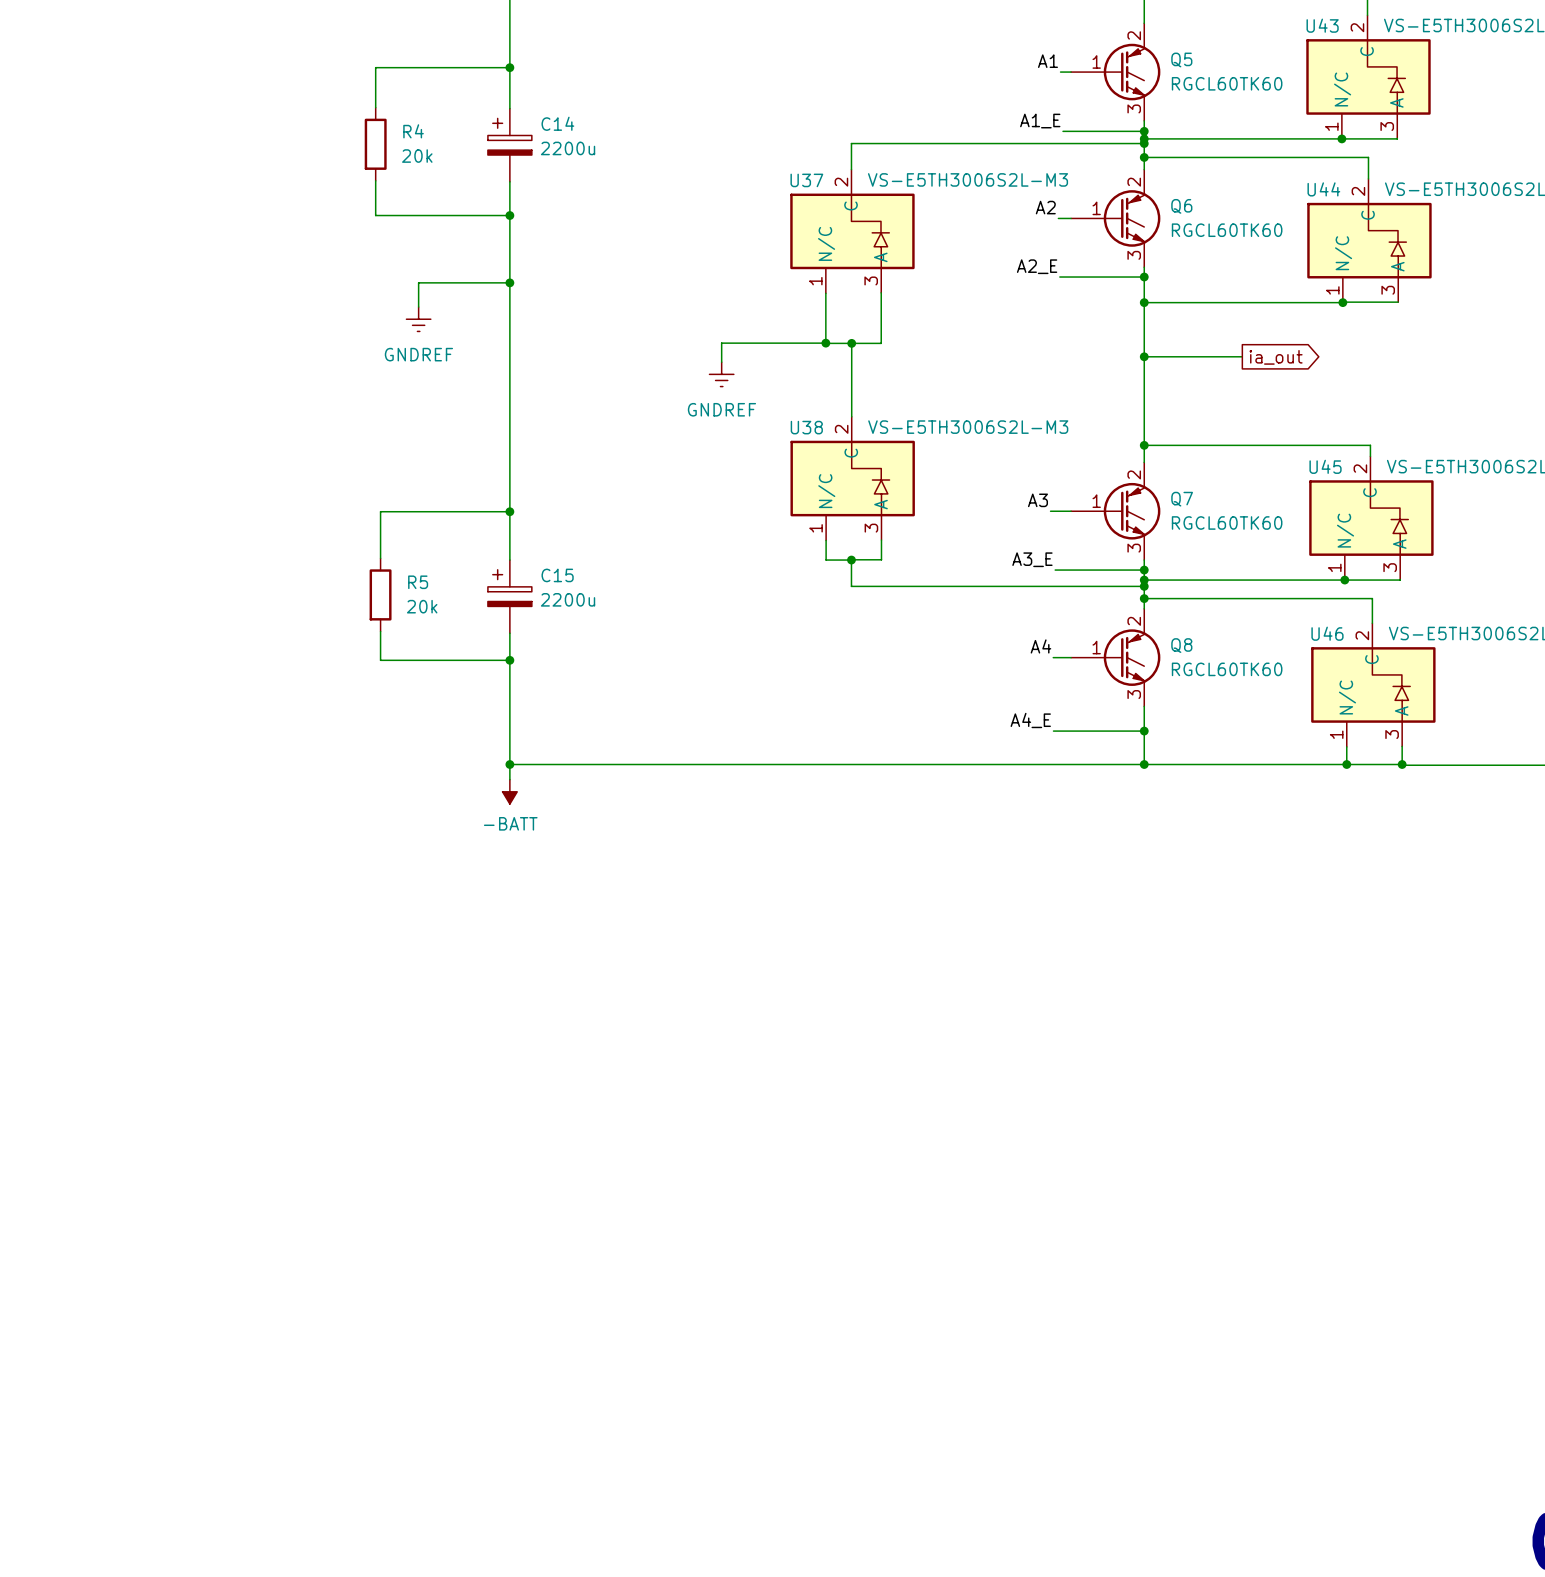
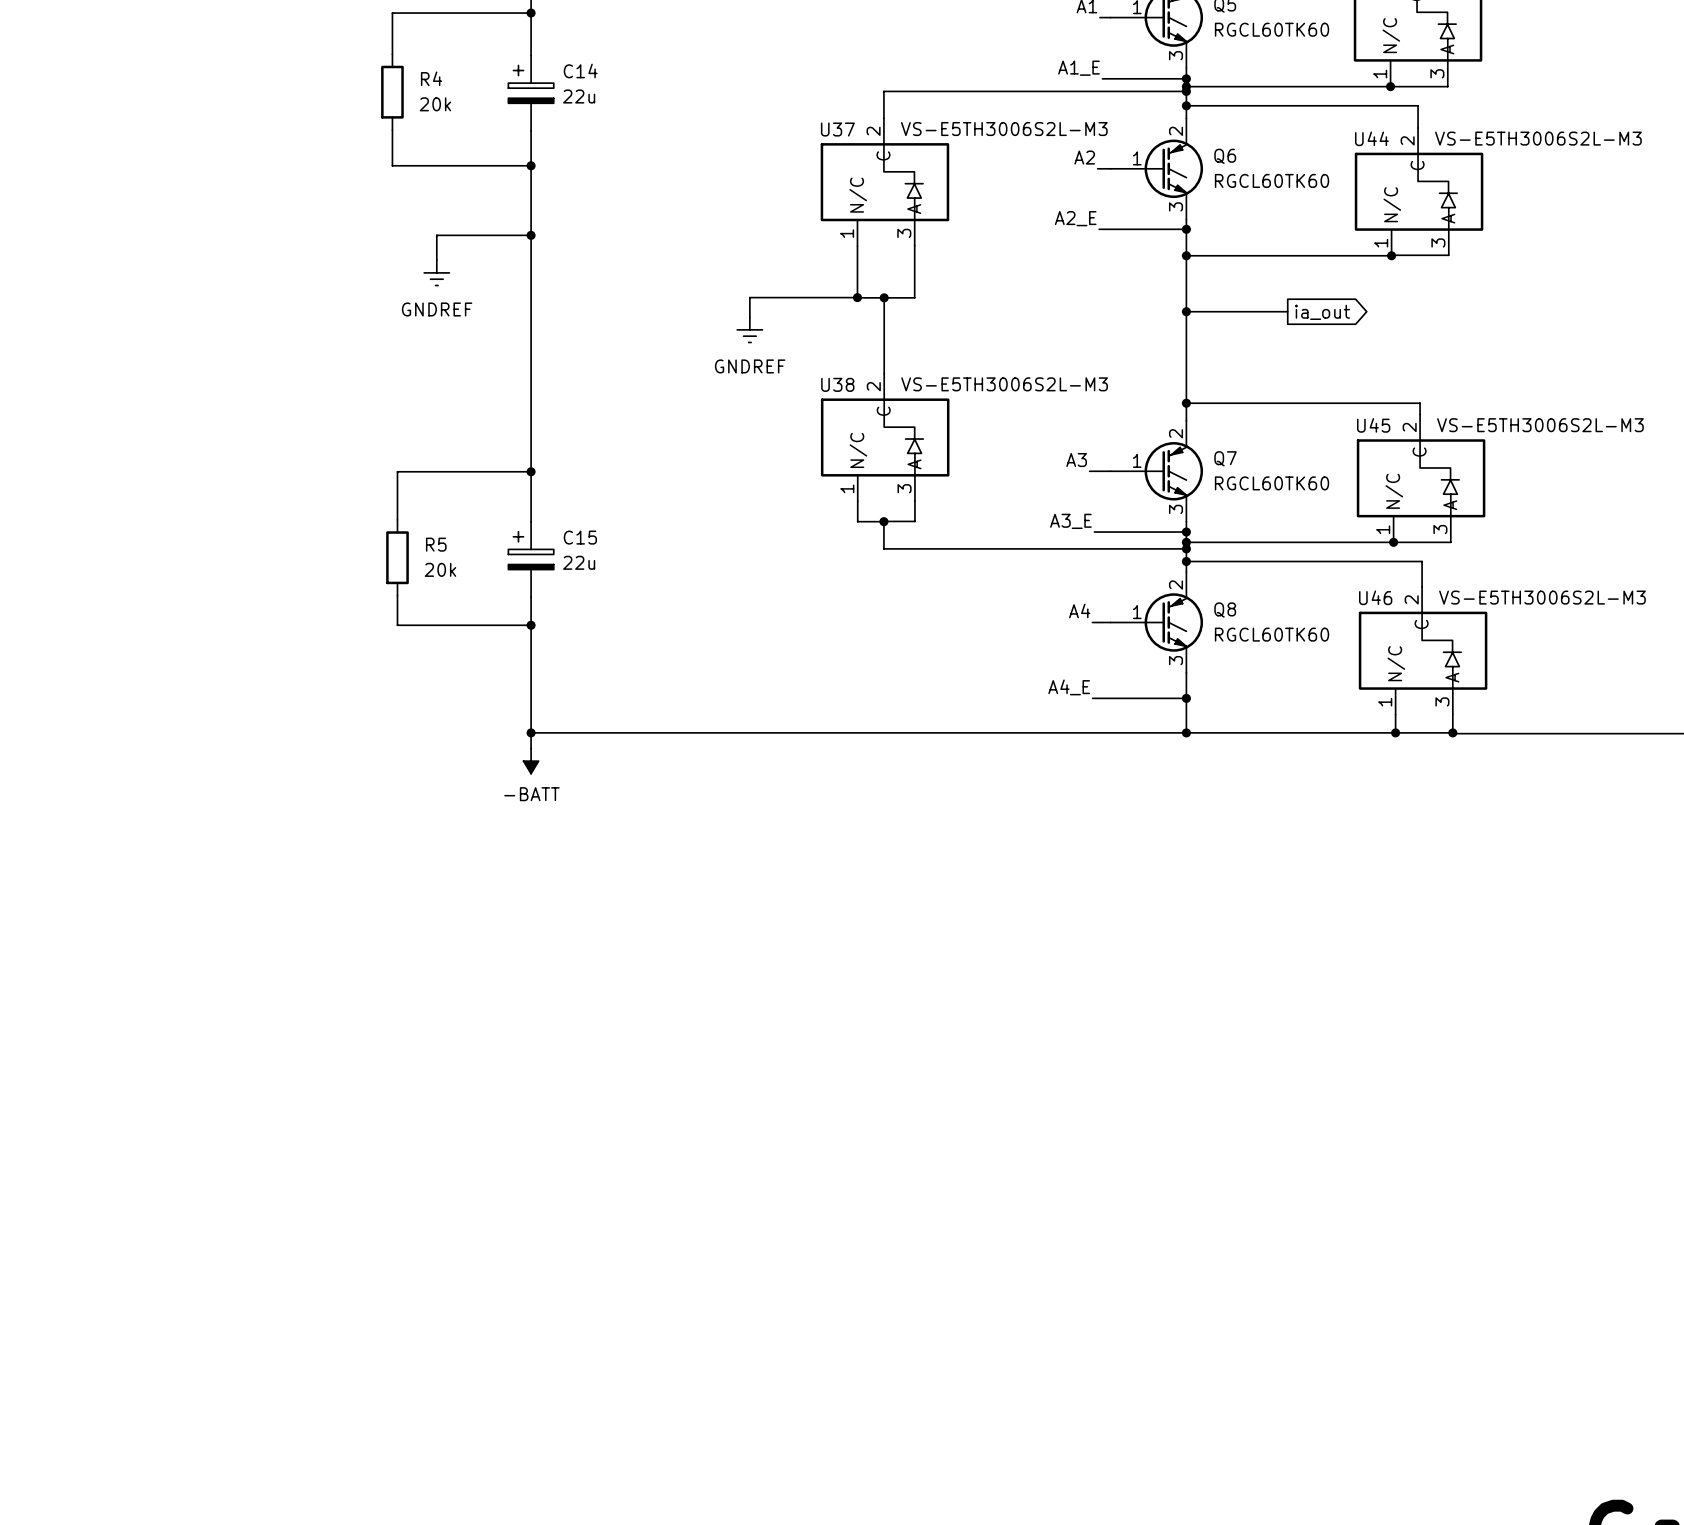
C14 value: 2200u (568, 148) -> 22u (579, 96)
C15 value: 2200u (568, 599) -> 22u (579, 562)

